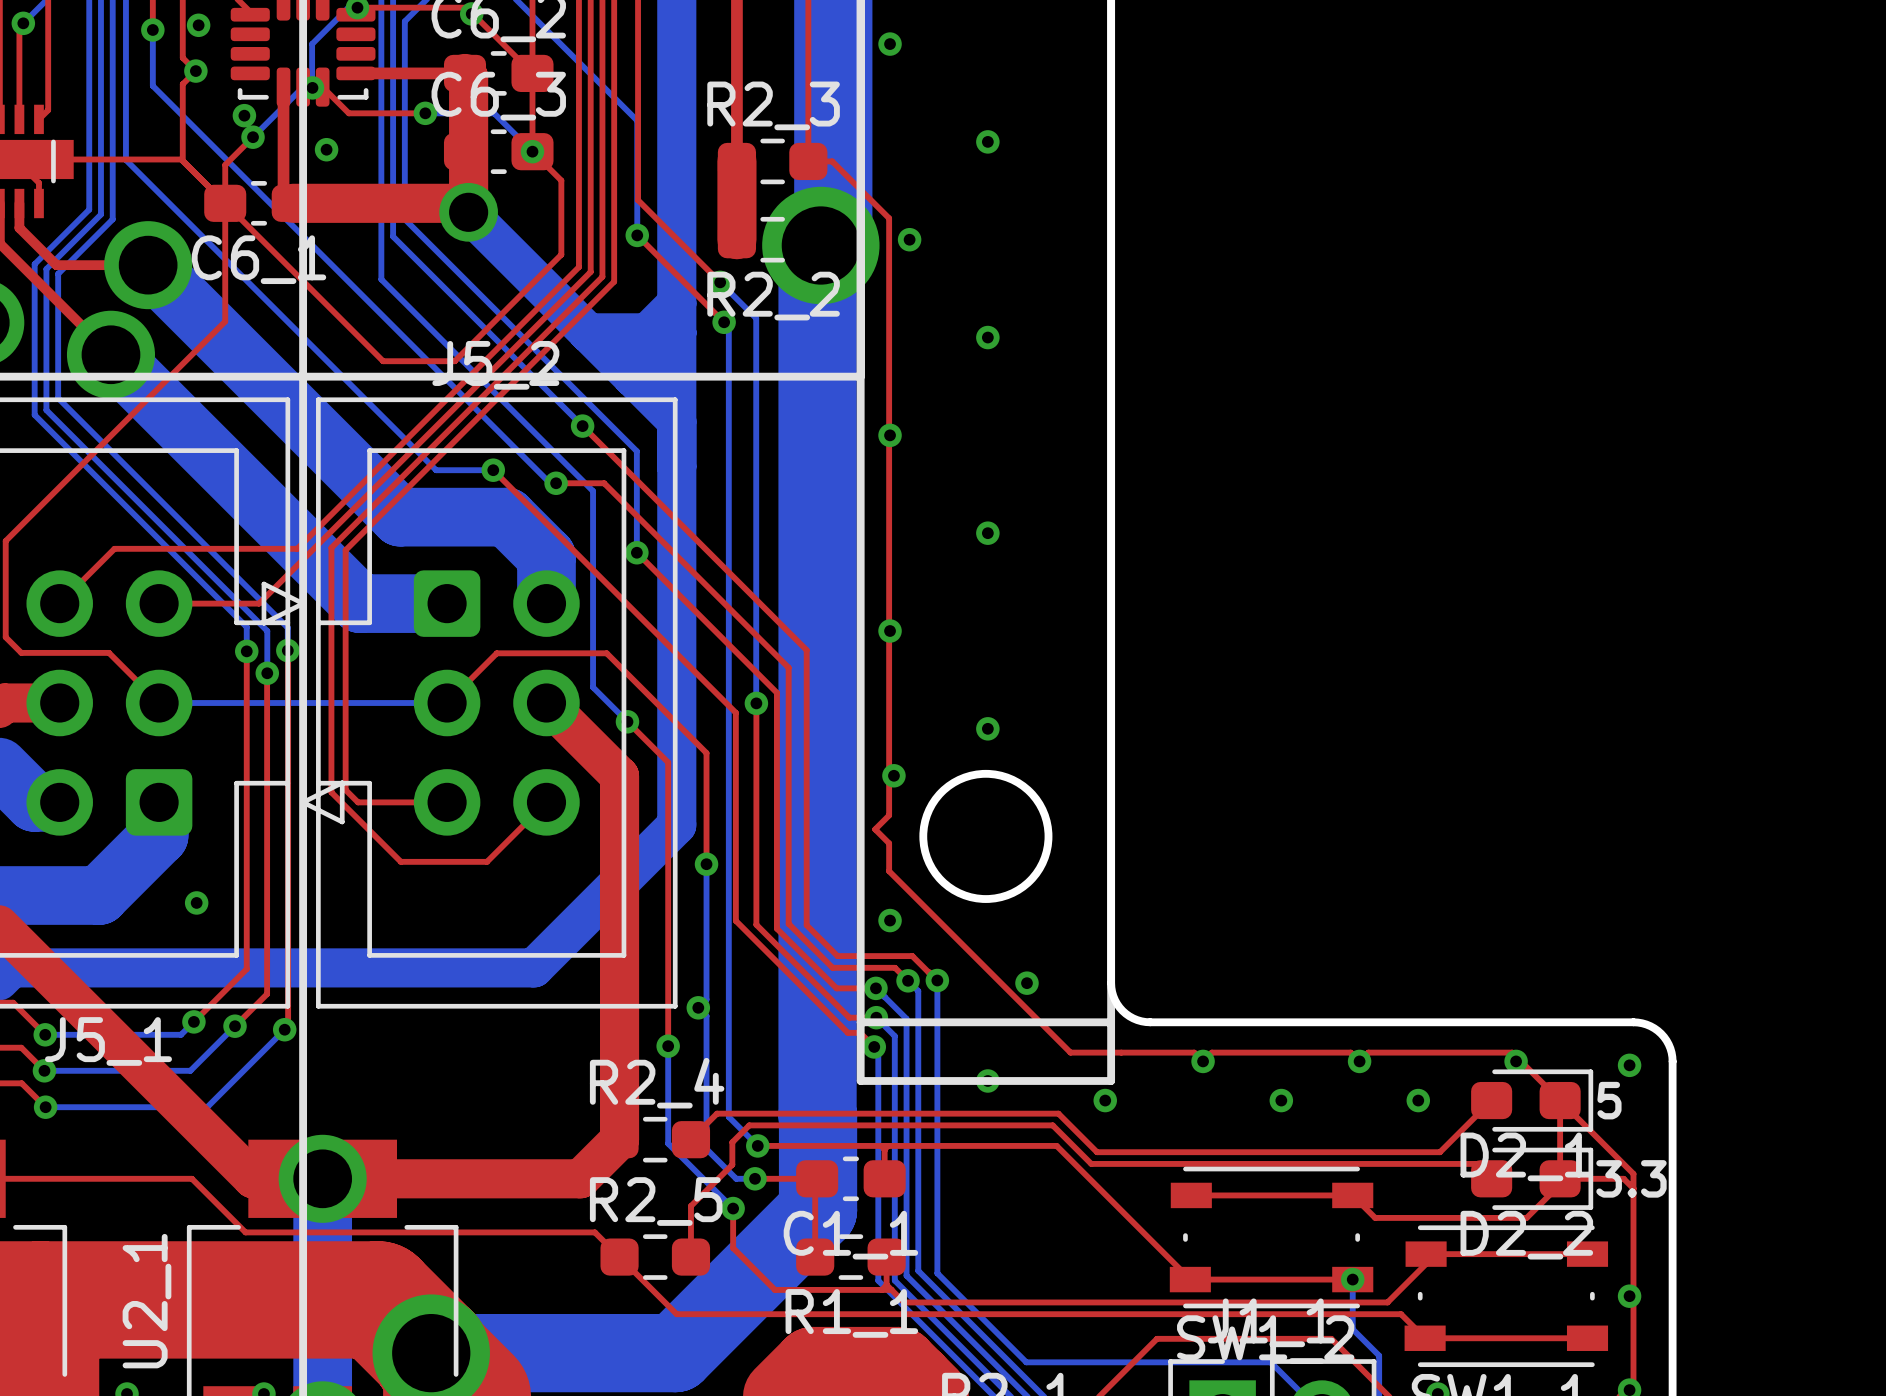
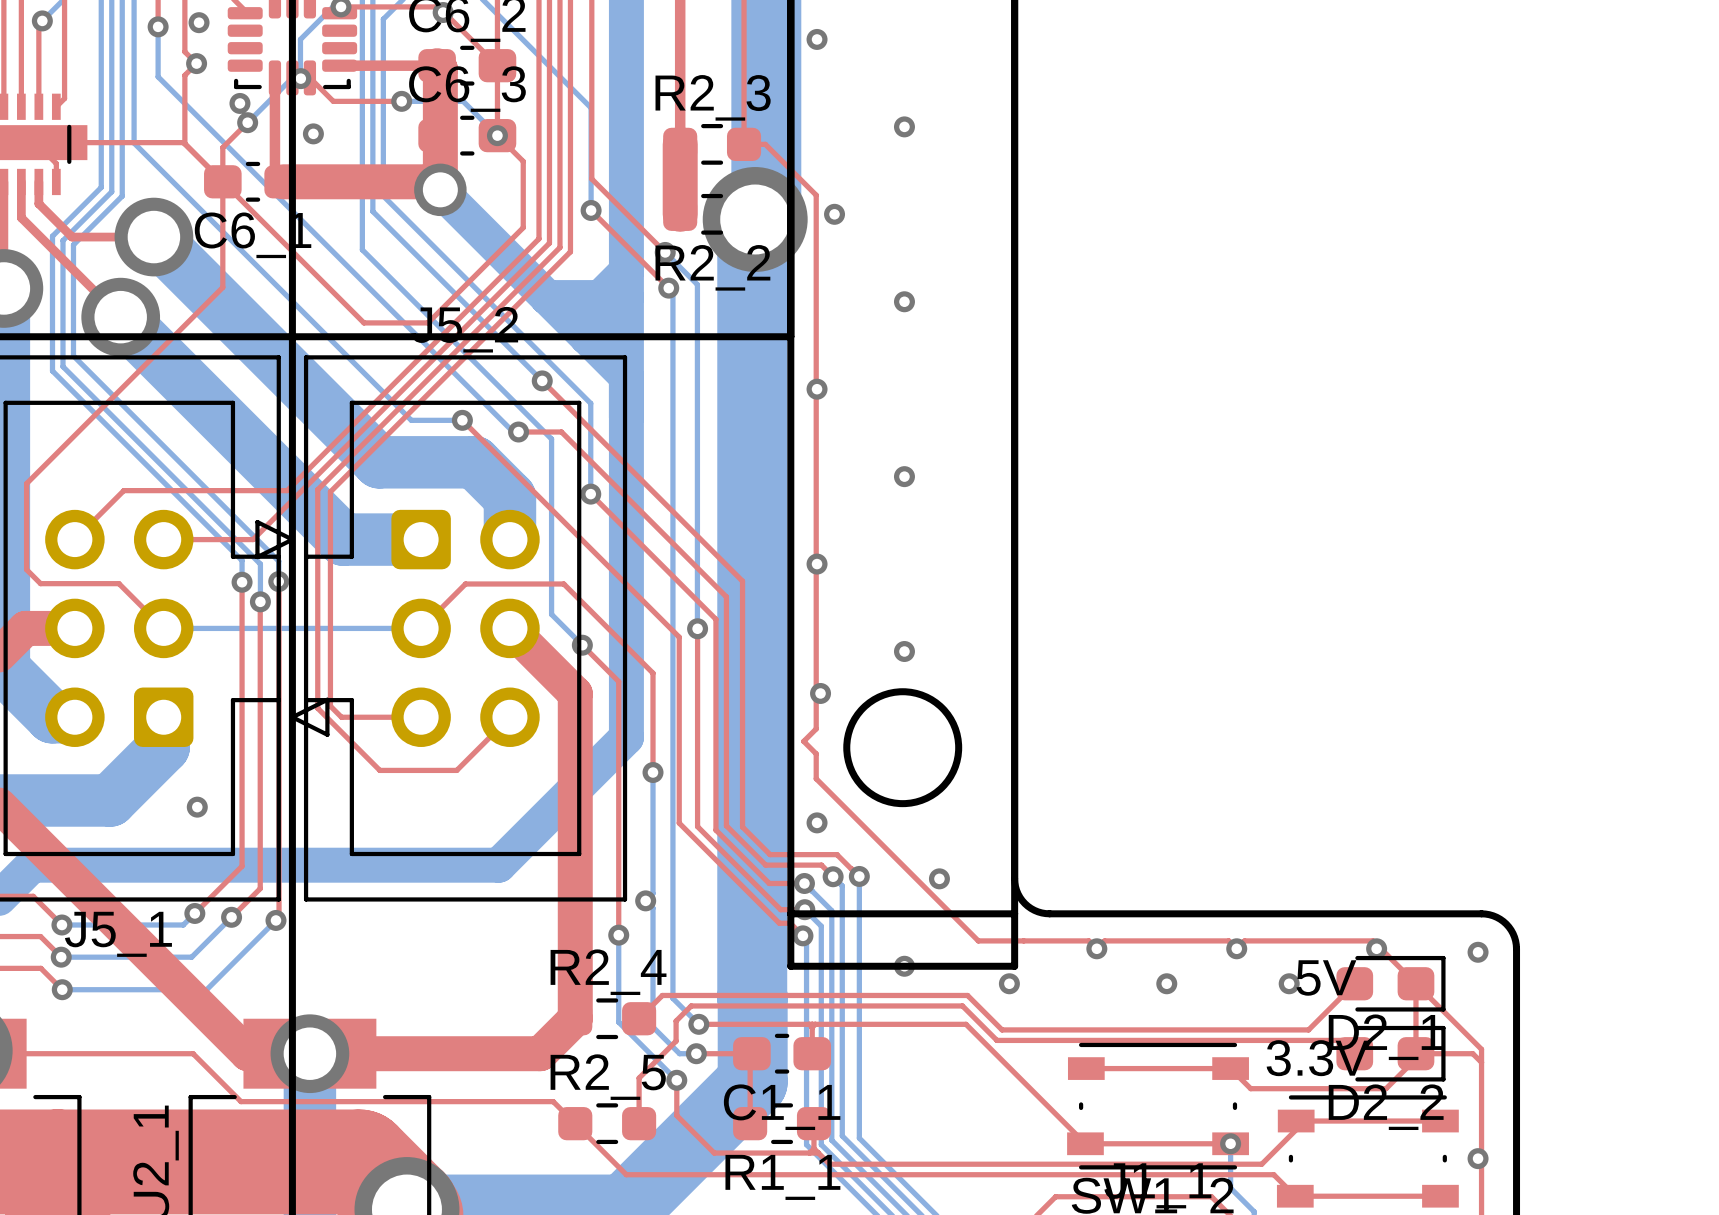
text: none -> 5V (1326, 977)
text: 5 (1609, 1100) -> none
text: 3.3 (1631, 1178) -> none
text: none -> 3.3V (1317, 1058)

